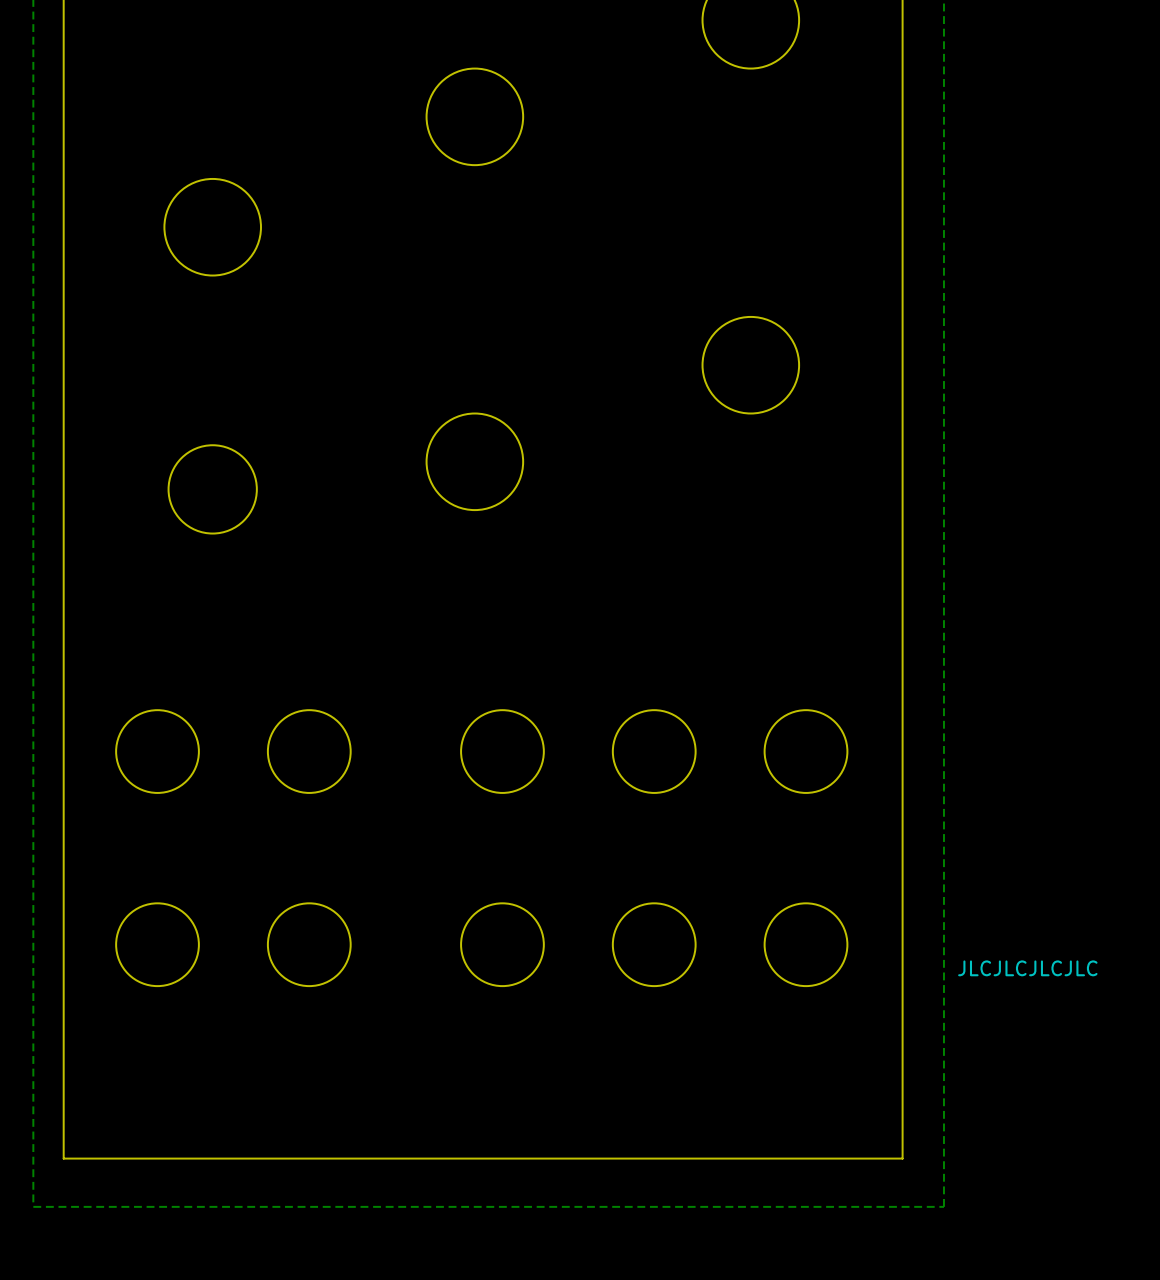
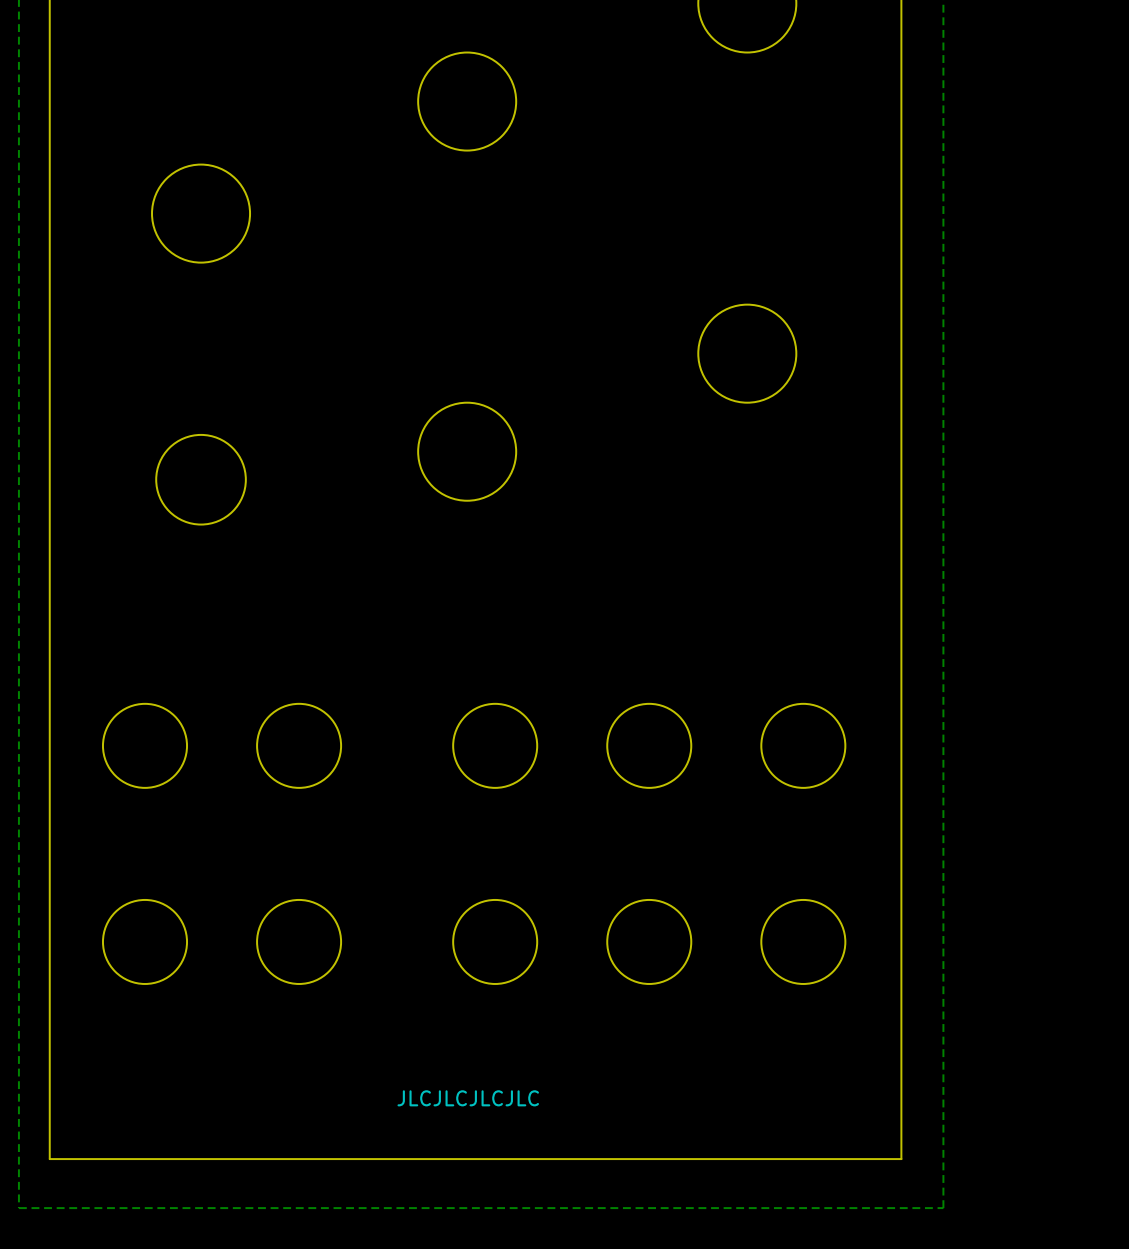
text: JLCJLCJLCJLC (1027, 968) -> none
text: none -> JLCJLCJLCJLC (468, 1098)

